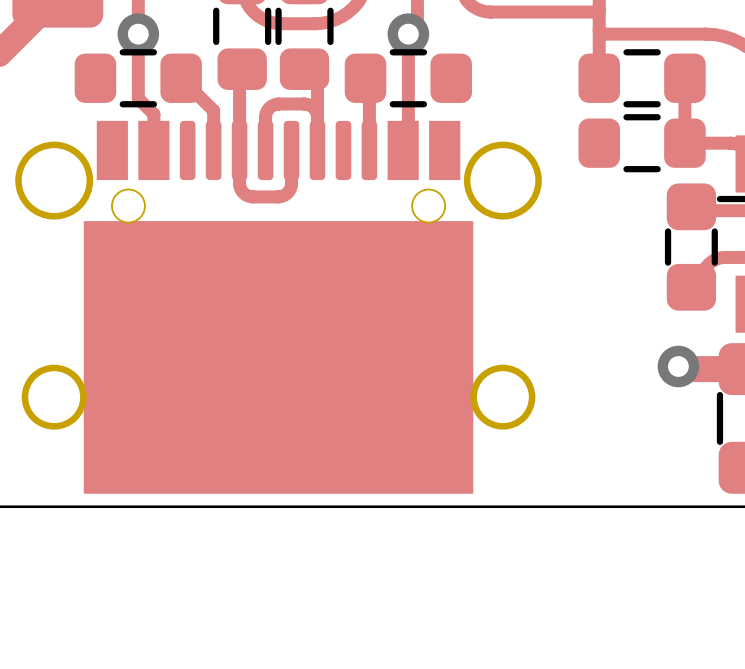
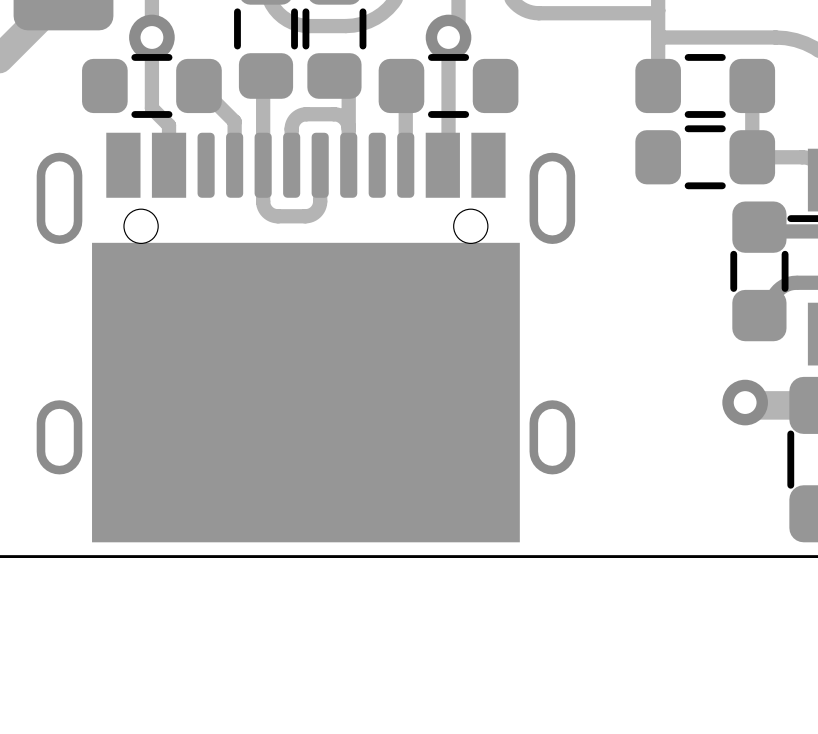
part footprint: [15, 120, 542, 494] -> [36, 132, 576, 543]

